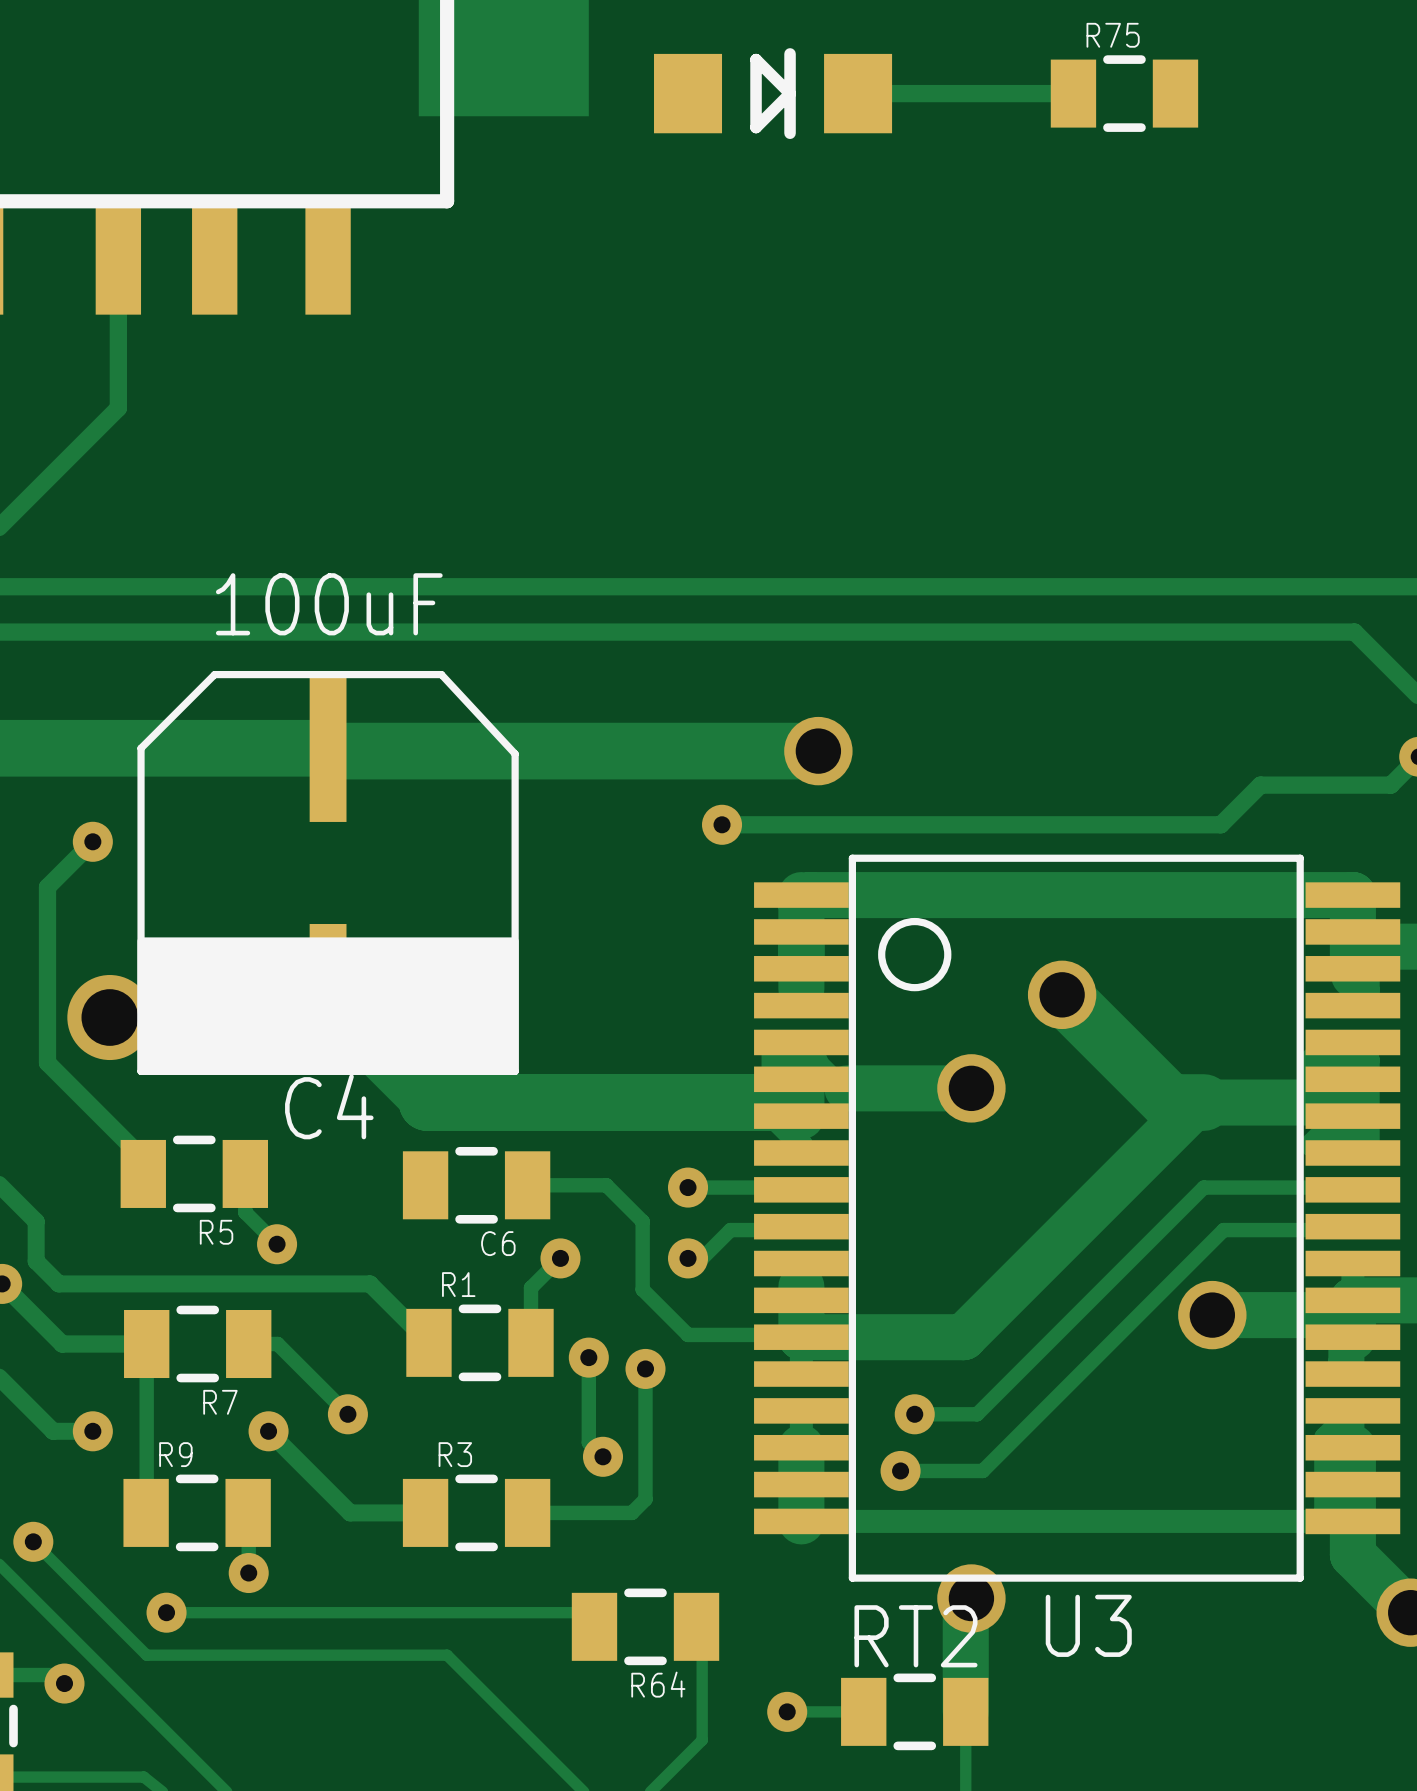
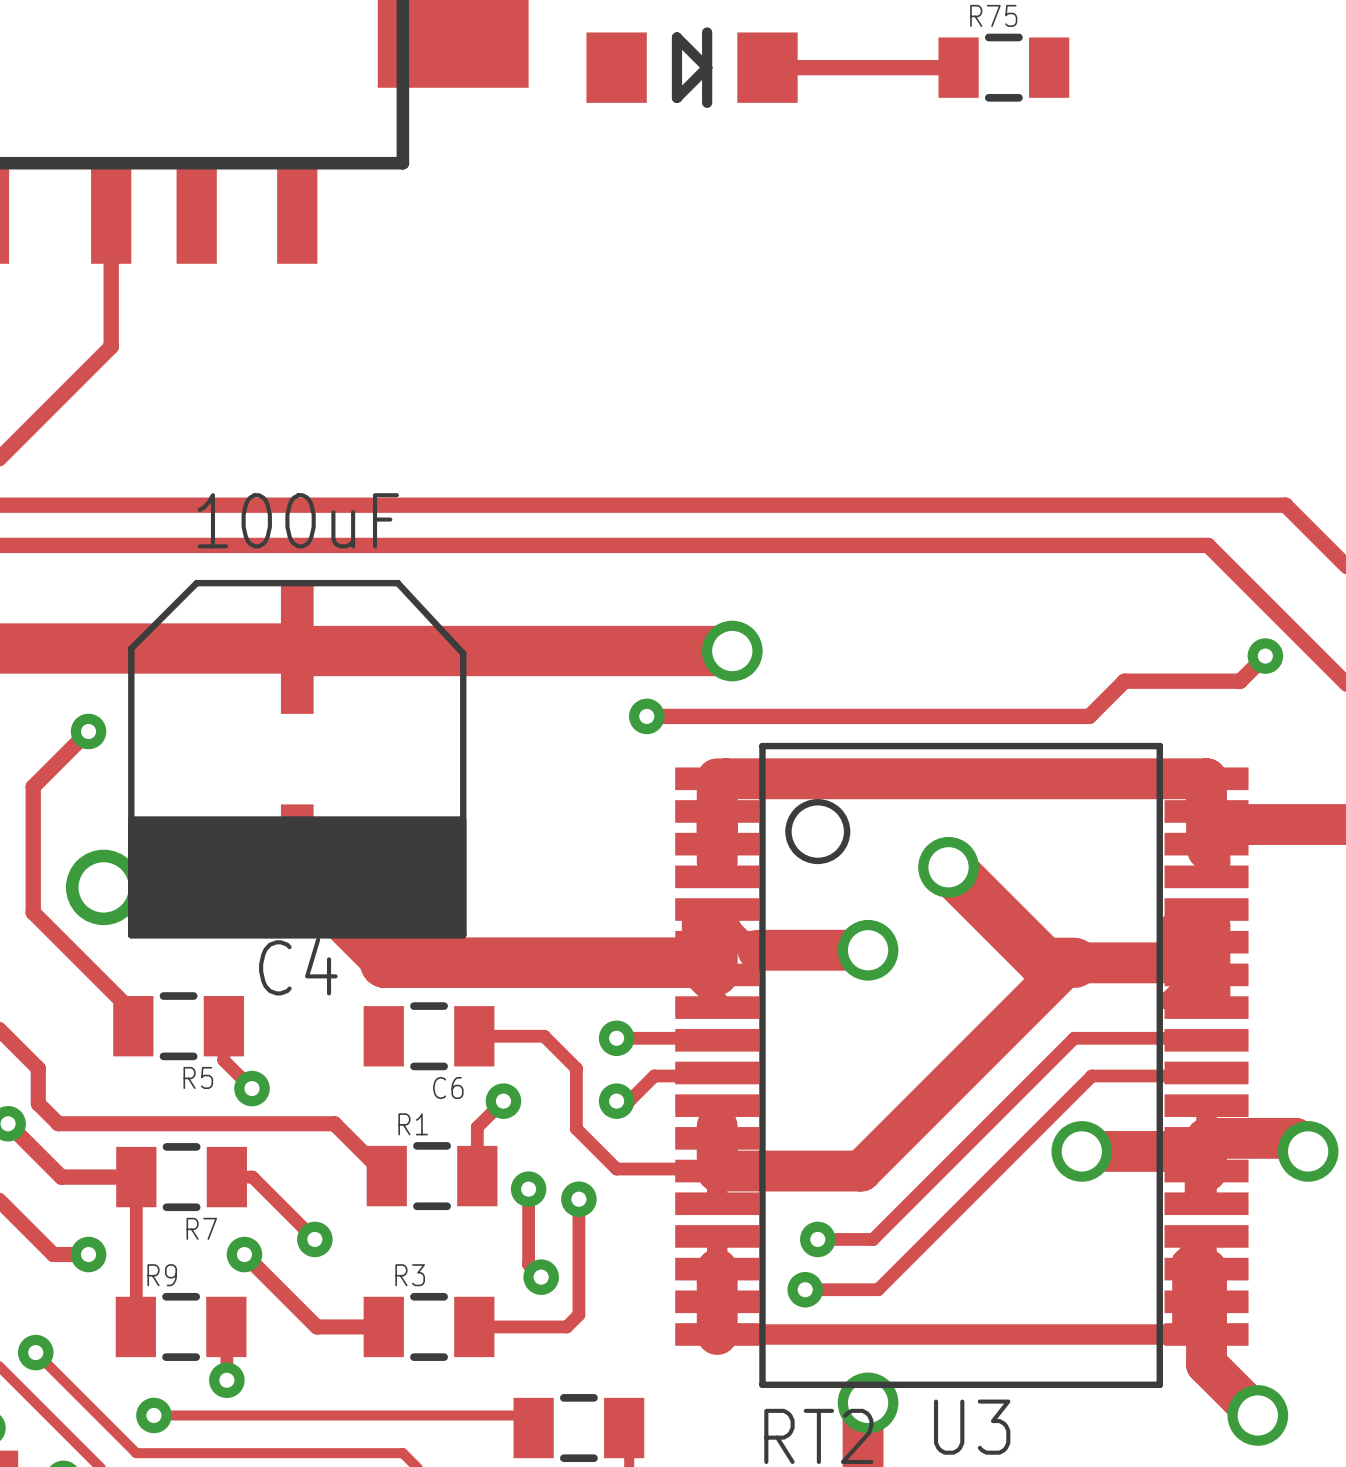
track: (47, 887) (47, 1062) -> (48, 771) (33, 786) (33, 912) (48, 927)

